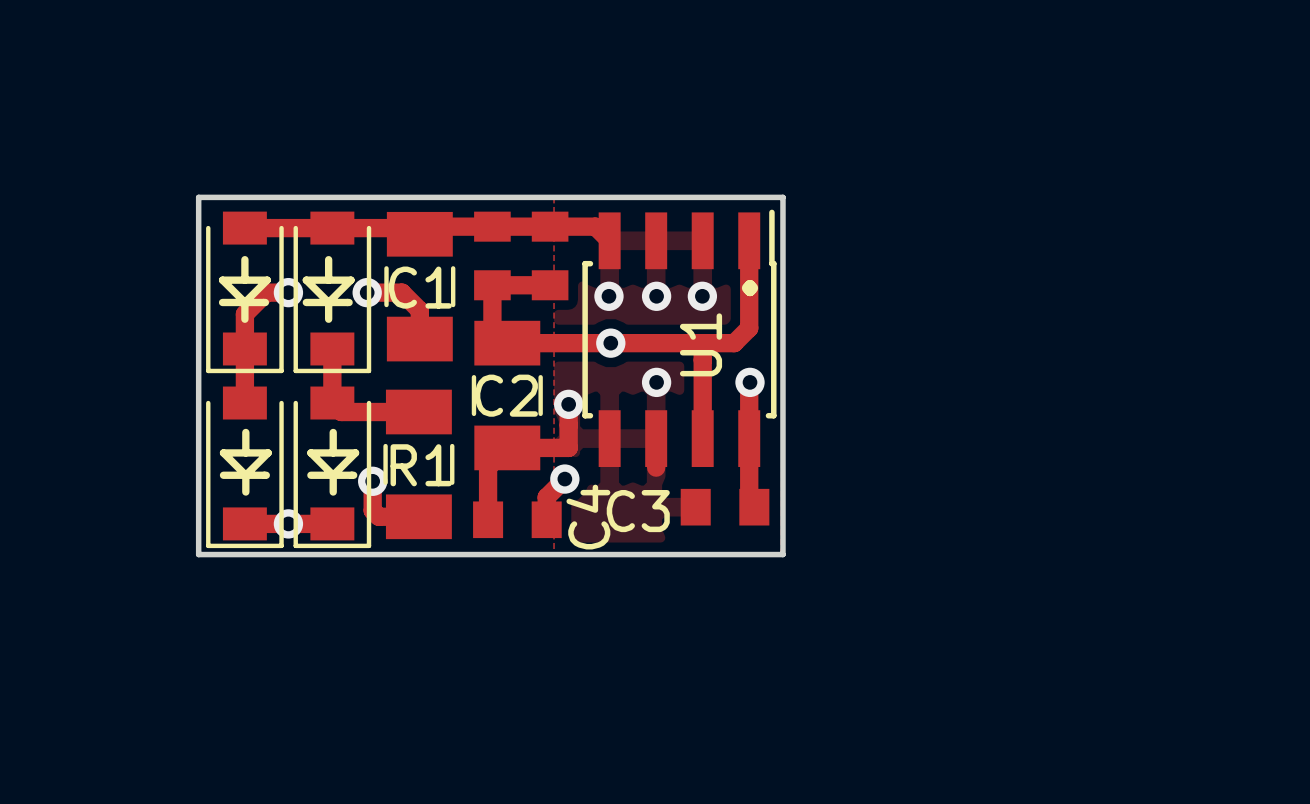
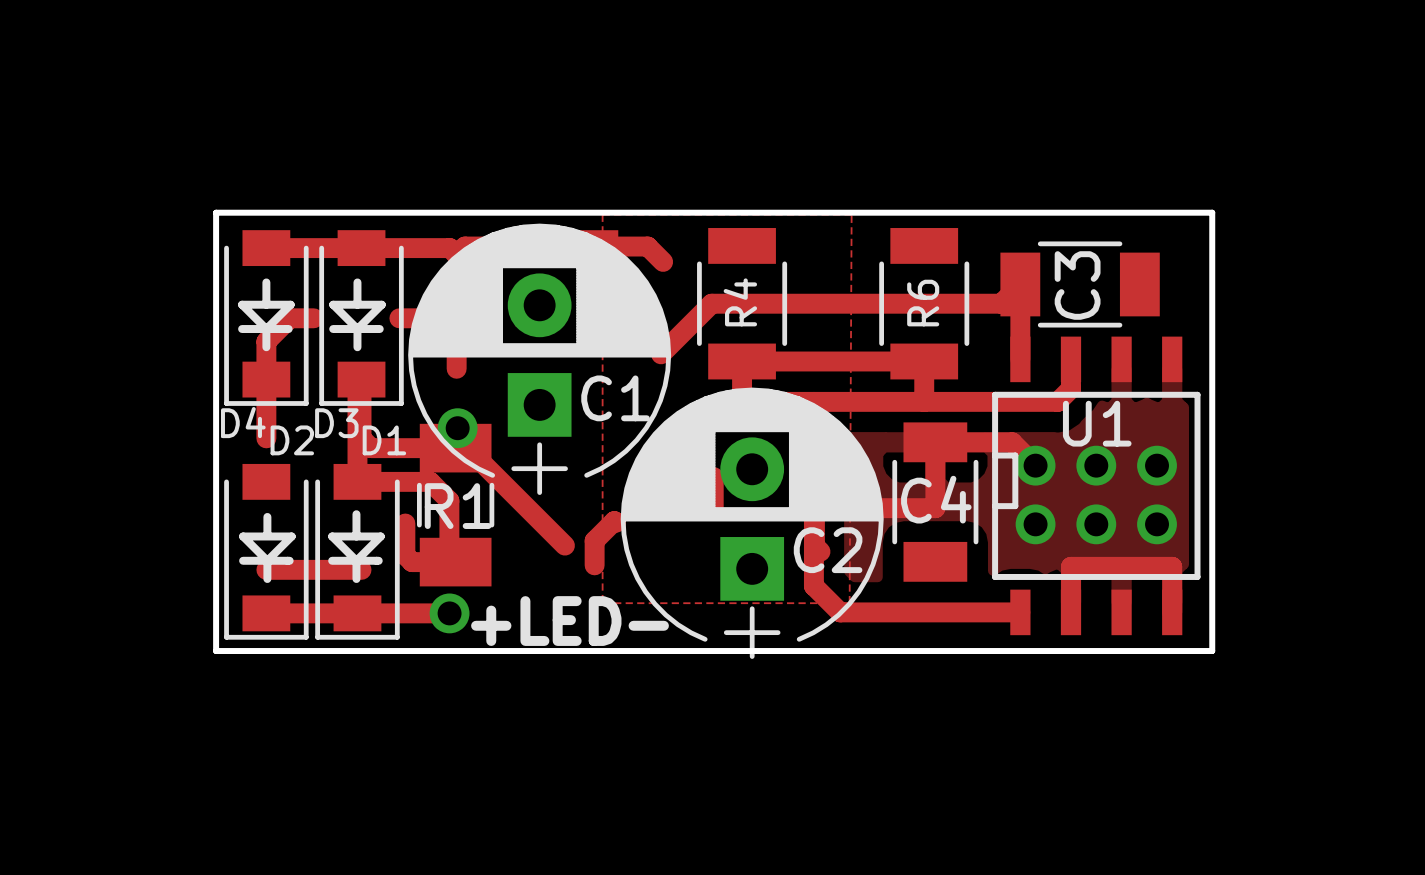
board edge: (198, 197) (782, 197) (782, 554) (198, 554) -> (216, 214) (216, 212) (1212, 212) (1212, 651) (216, 651) (216, 603)
U1 footprint: [582, 209, 777, 468] -> [992, 336, 1201, 636]
C1 footprint: [384, 211, 456, 362] -> [408, 223, 672, 495]
track: (749, 240) (749, 328) (734, 343) (507, 343) (492, 328) (492, 285) (550, 285) -> none
R4: none -> (742, 303)
R6: none -> (924, 303)
C1 name position: C1 (420, 287) -> C1 (615, 398)
text: . (750, 288) -> none
via: (288, 292) -> none
via: (367, 292) -> none
via: (608, 296) -> none
via: (656, 296) -> none
via: (702, 296) -> none
C2 footprint: [471, 320, 543, 471] -> [620, 387, 884, 659]
track: none -> (661, 354) (711, 303) (1001, 303) (1020, 284) (1020, 359)
track: none -> (1070, 359) (1070, 388) (1057, 401) (743, 401) (742, 361) (924, 361) (924, 401)
via: (610, 343) -> none
track: (702, 343) (702, 438) -> none
track: none -> (357, 379) (357, 481) (430, 481) (449, 500) (449, 545)
track: none -> (813, 401) (813, 586) (840, 612) (1020, 612)
via: (656, 382) -> none
via: (750, 382) -> none
text: none -> D4 (243, 422)
text: none -> D3 (336, 423)
track: none -> (457, 428) (457, 438) (564, 545)
via: none -> (457, 428)
C2 name position: C2 (506, 395) -> C2 (828, 550)
text: none -> D2 (292, 440)
text: none -> D1 (384, 440)
track: (568, 404) (568, 447) (507, 447) (488, 467) (488, 519) -> none
via: (568, 404) -> none
track: none -> (1035, 465) (1012, 442) (935, 442) (935, 508) (866, 508)
via: none -> (1035, 465)
via: none -> (1096, 465)
via: none -> (1157, 465)
line: (245, 432) (245, 452) -> none
line: (333, 432) (333, 452) -> (356, 514) (356, 536)
line: (223, 452) (268, 452) (245, 475) (223, 452) -> none
part position: (244, 467) -> (266, 551)
part position: (332, 467) -> (357, 551)
line: (223, 475) (266, 475) -> (243, 560) (289, 560)
line: (310, 475) (353, 475) -> (332, 560) (378, 560)
line: (333, 475) (333, 492) -> (356, 560) (356, 579)
line: (333, 475) (355, 452) (310, 452) (333, 475) -> (356, 560) (380, 536) (332, 536) (356, 560)
via: (564, 479) -> none
via: (372, 481) -> none
via: none -> (1035, 524)
via: none -> (1096, 524)
via: none -> (1157, 524)
C3 footprint: [680, 488, 770, 526] -> [1000, 241, 1160, 328]
C4 footprint: [473, 501, 562, 539] -> [892, 422, 979, 582]
C3 name position: C3 (638, 511) -> C3 (1077, 285)
line: none -> (267, 560) (267, 579)
line: none -> (267, 560) (243, 536) (291, 536) (267, 560)
C4 name position: C4 (588, 517) -> C4 (936, 499)
via: (288, 523) -> none
track: none -> (266, 613) (449, 613)
via: none -> (449, 613)
track: none -> (1070, 612) (1070, 566) (1172, 566) (1172, 612)
text: none -> +LED- (570, 621)

